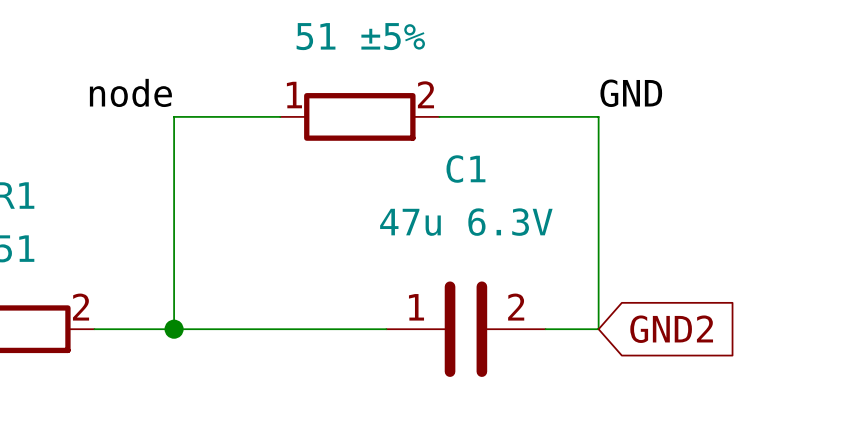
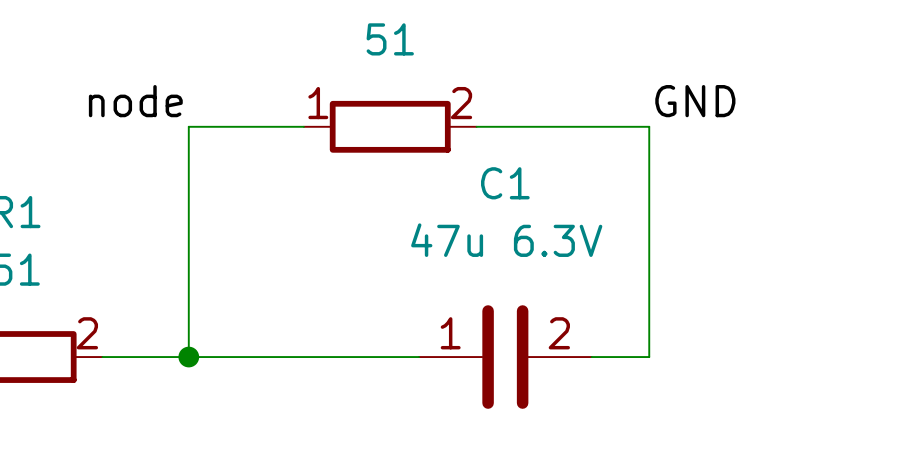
part value: 51 ±5% (360, 36) -> 51 (390, 39)
global label: GND2 (671, 329) -> none

